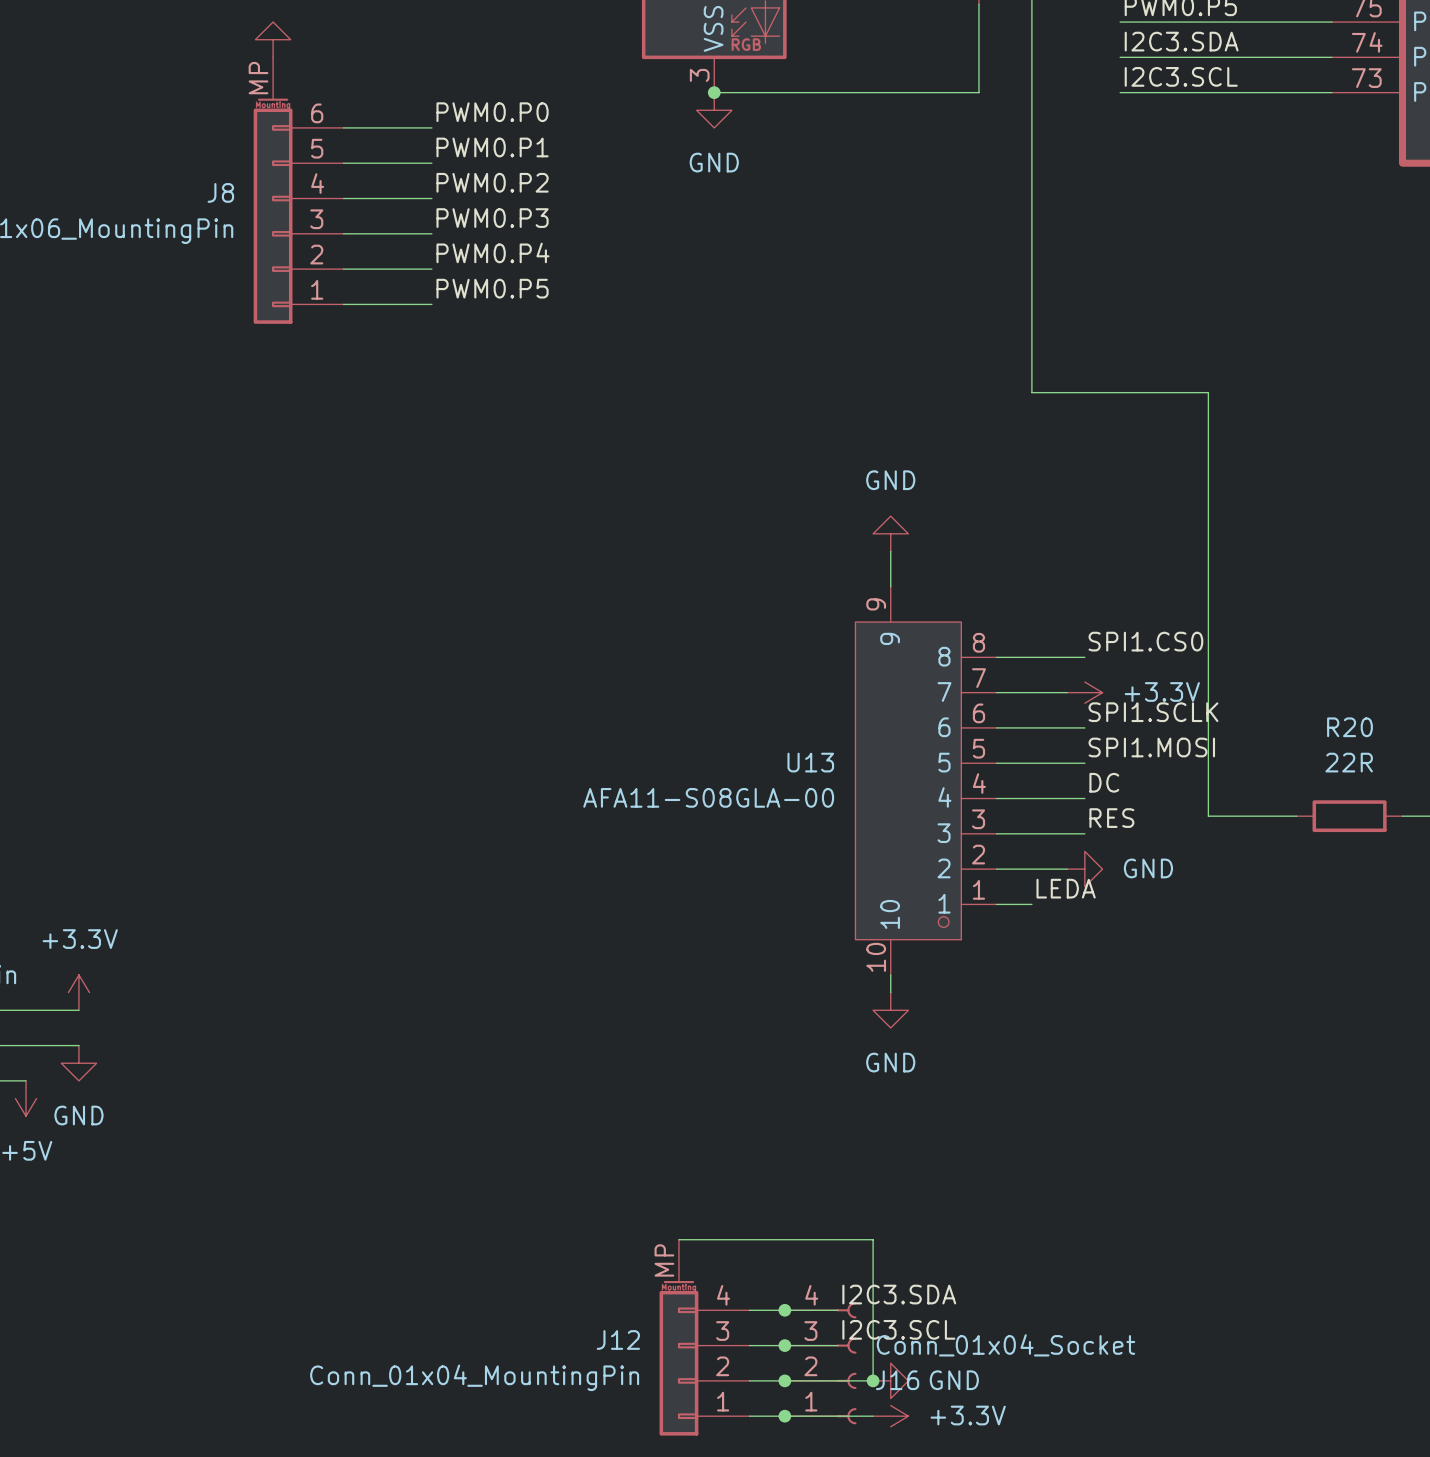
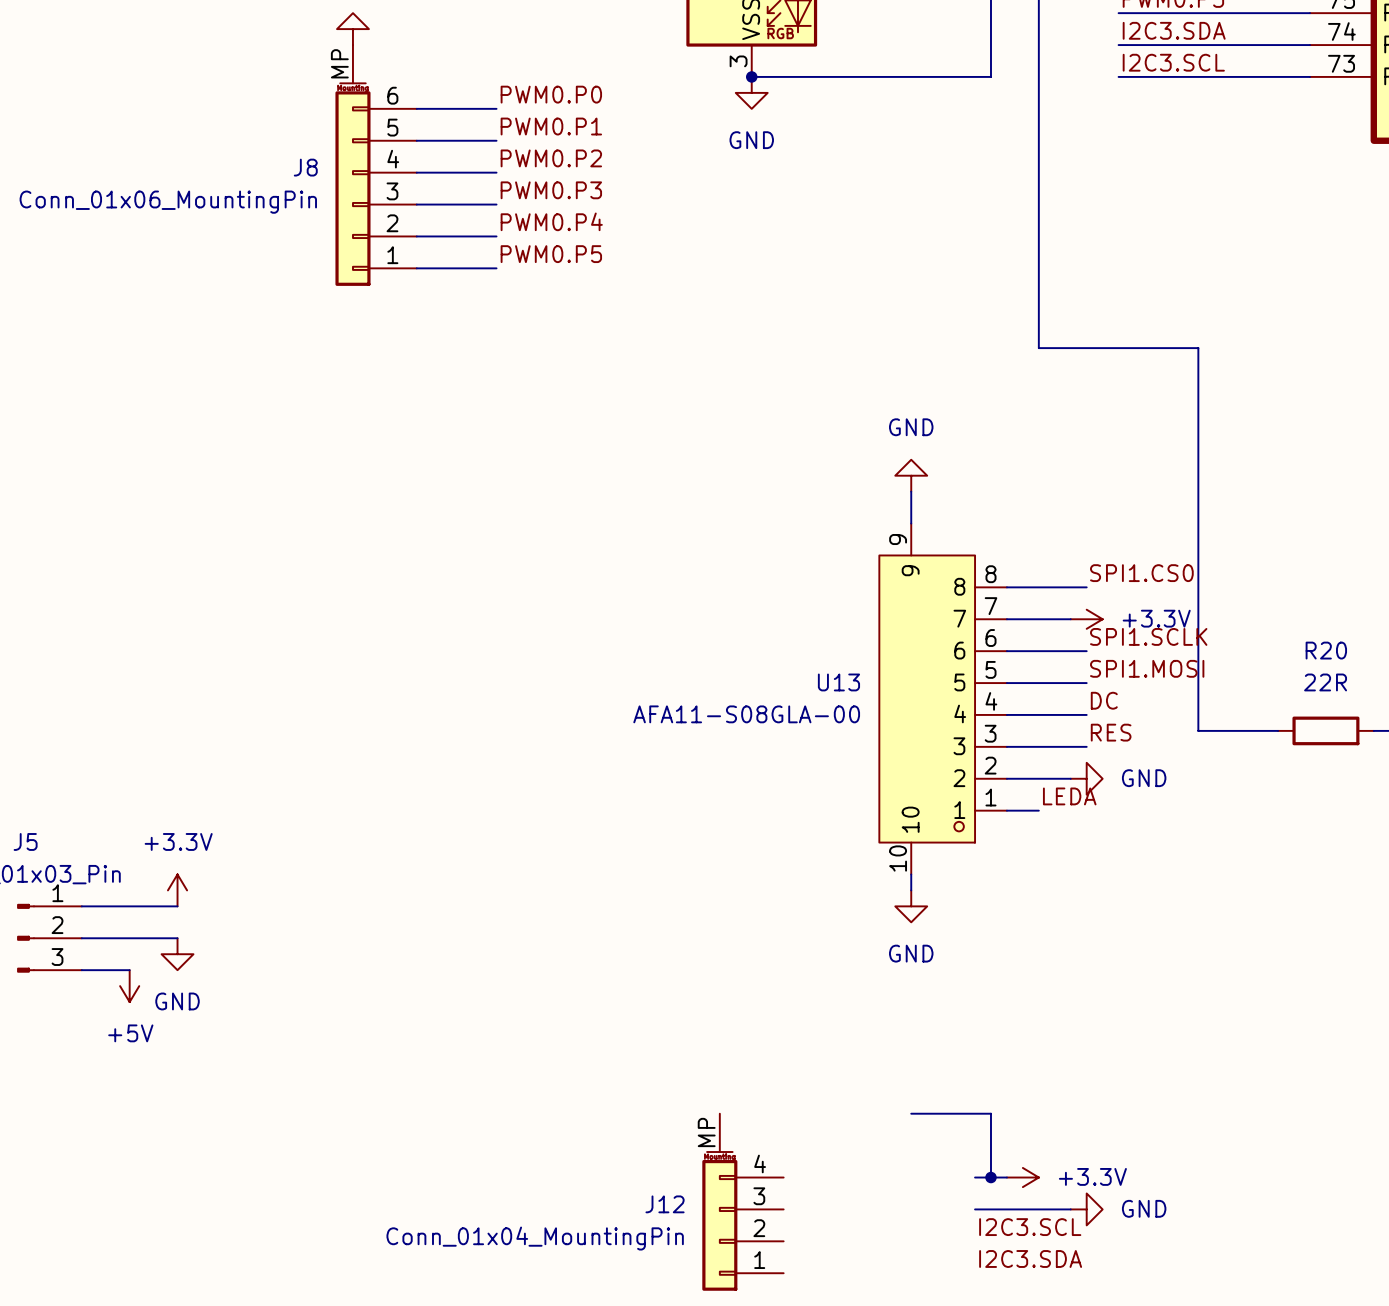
wire: (678, 1239) (873, 1239) (873, 1380) (749, 1380) -> none
wire: none -> (911, 1113) (990, 1113) (990, 1177)
label position: I2C3.SDA (899, 1294) -> I2C3.SDA (1030, 1258)
wire: (749, 1310) (837, 1310) -> none
junction: (784, 1310) -> none
wire: none -> (975, 1177) (1006, 1177)
junction: none -> (990, 1177)
label position: I2C3.SCL (898, 1329) -> I2C3.SCL (1030, 1227)
wire: (749, 1345) (837, 1345) -> none
junction: (784, 1345) -> none
wire: none -> (975, 1209) (1070, 1209)
J16: Conn_01x04_Socket (820, 1363) -> none
junction: (784, 1380) -> none
junction: (873, 1380) -> none
power symbol position: GND (890, 1380) -> GND (1086, 1209)
wire: (749, 1416) (873, 1416) -> none
junction: (784, 1416) -> none
power symbol position: +3.3V (890, 1416) -> +3.3V (1022, 1177)

